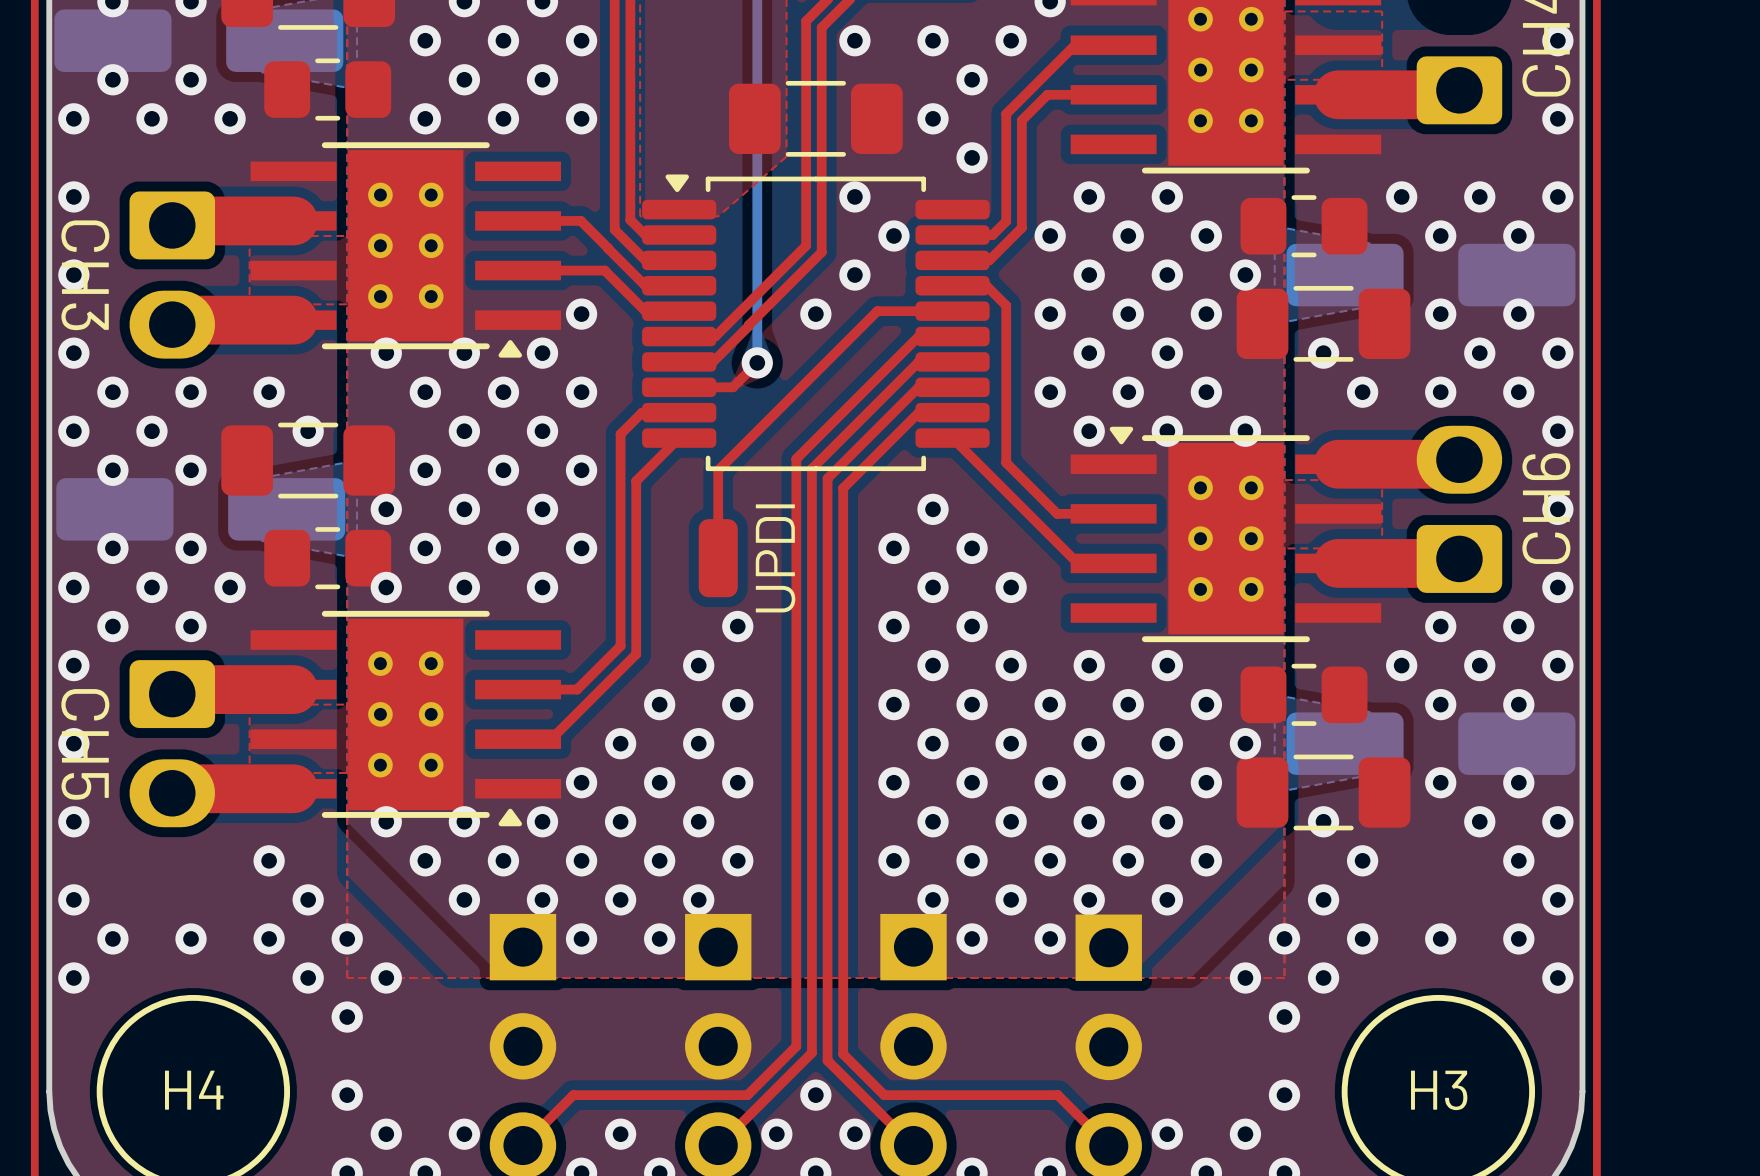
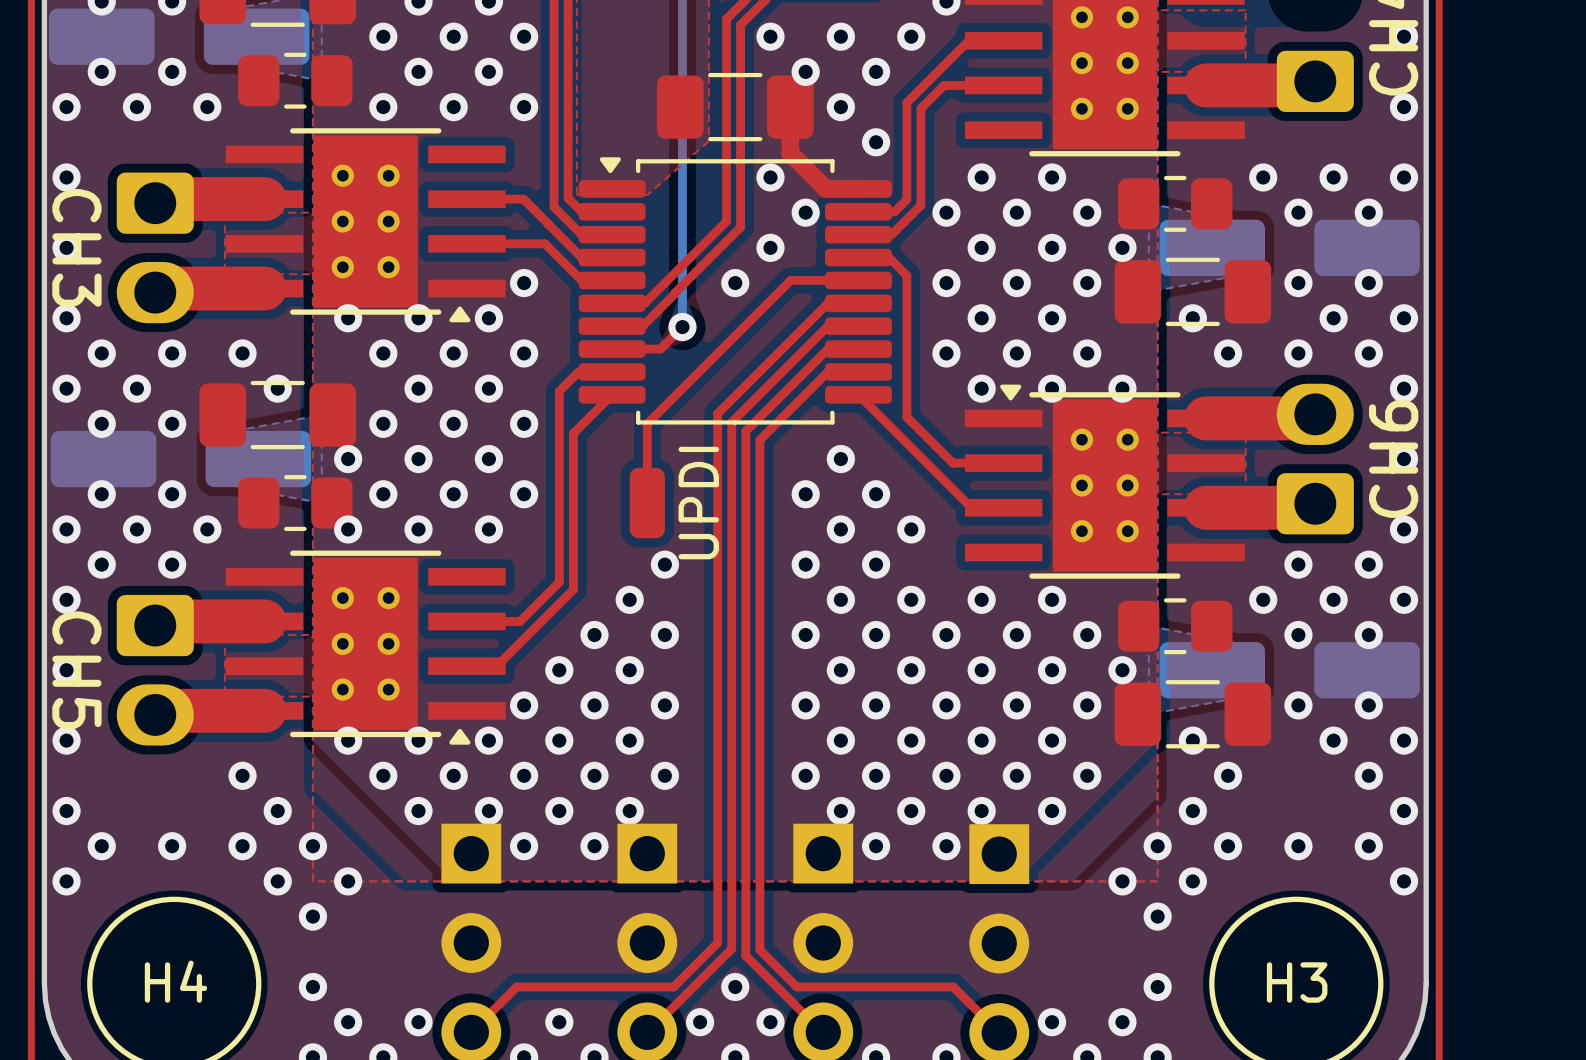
via: none -> (805, 71)
top track: none -> (790, 107) (790, 153) (825, 188) (858, 188)

